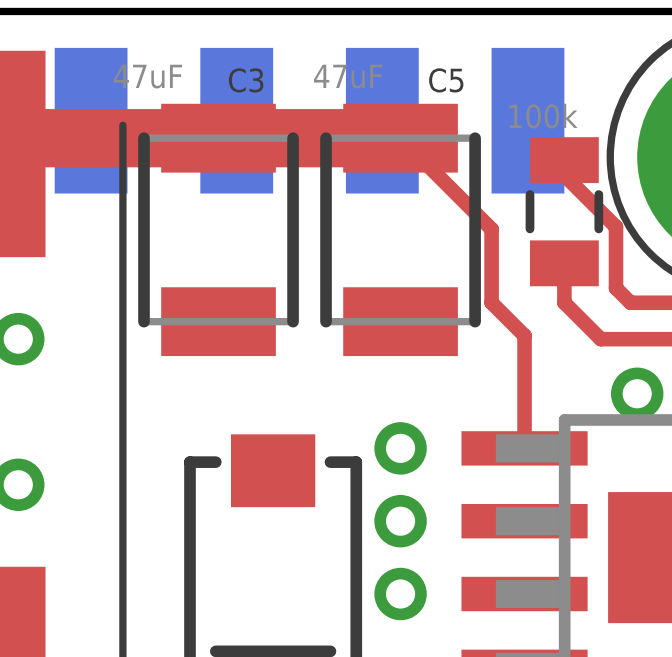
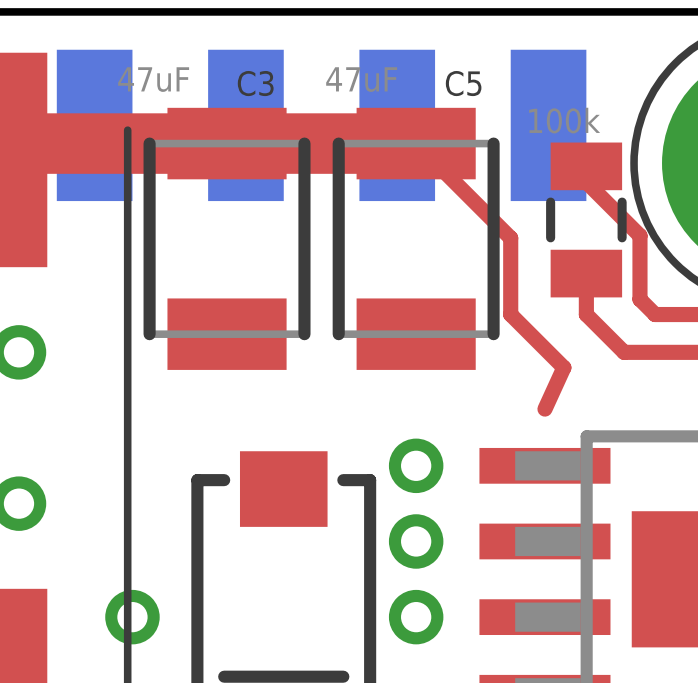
top track: (524, 335) (524, 448) -> (544, 348) (563, 367) (544, 409)
via: (637, 393) -> none
via: none -> (132, 617)

